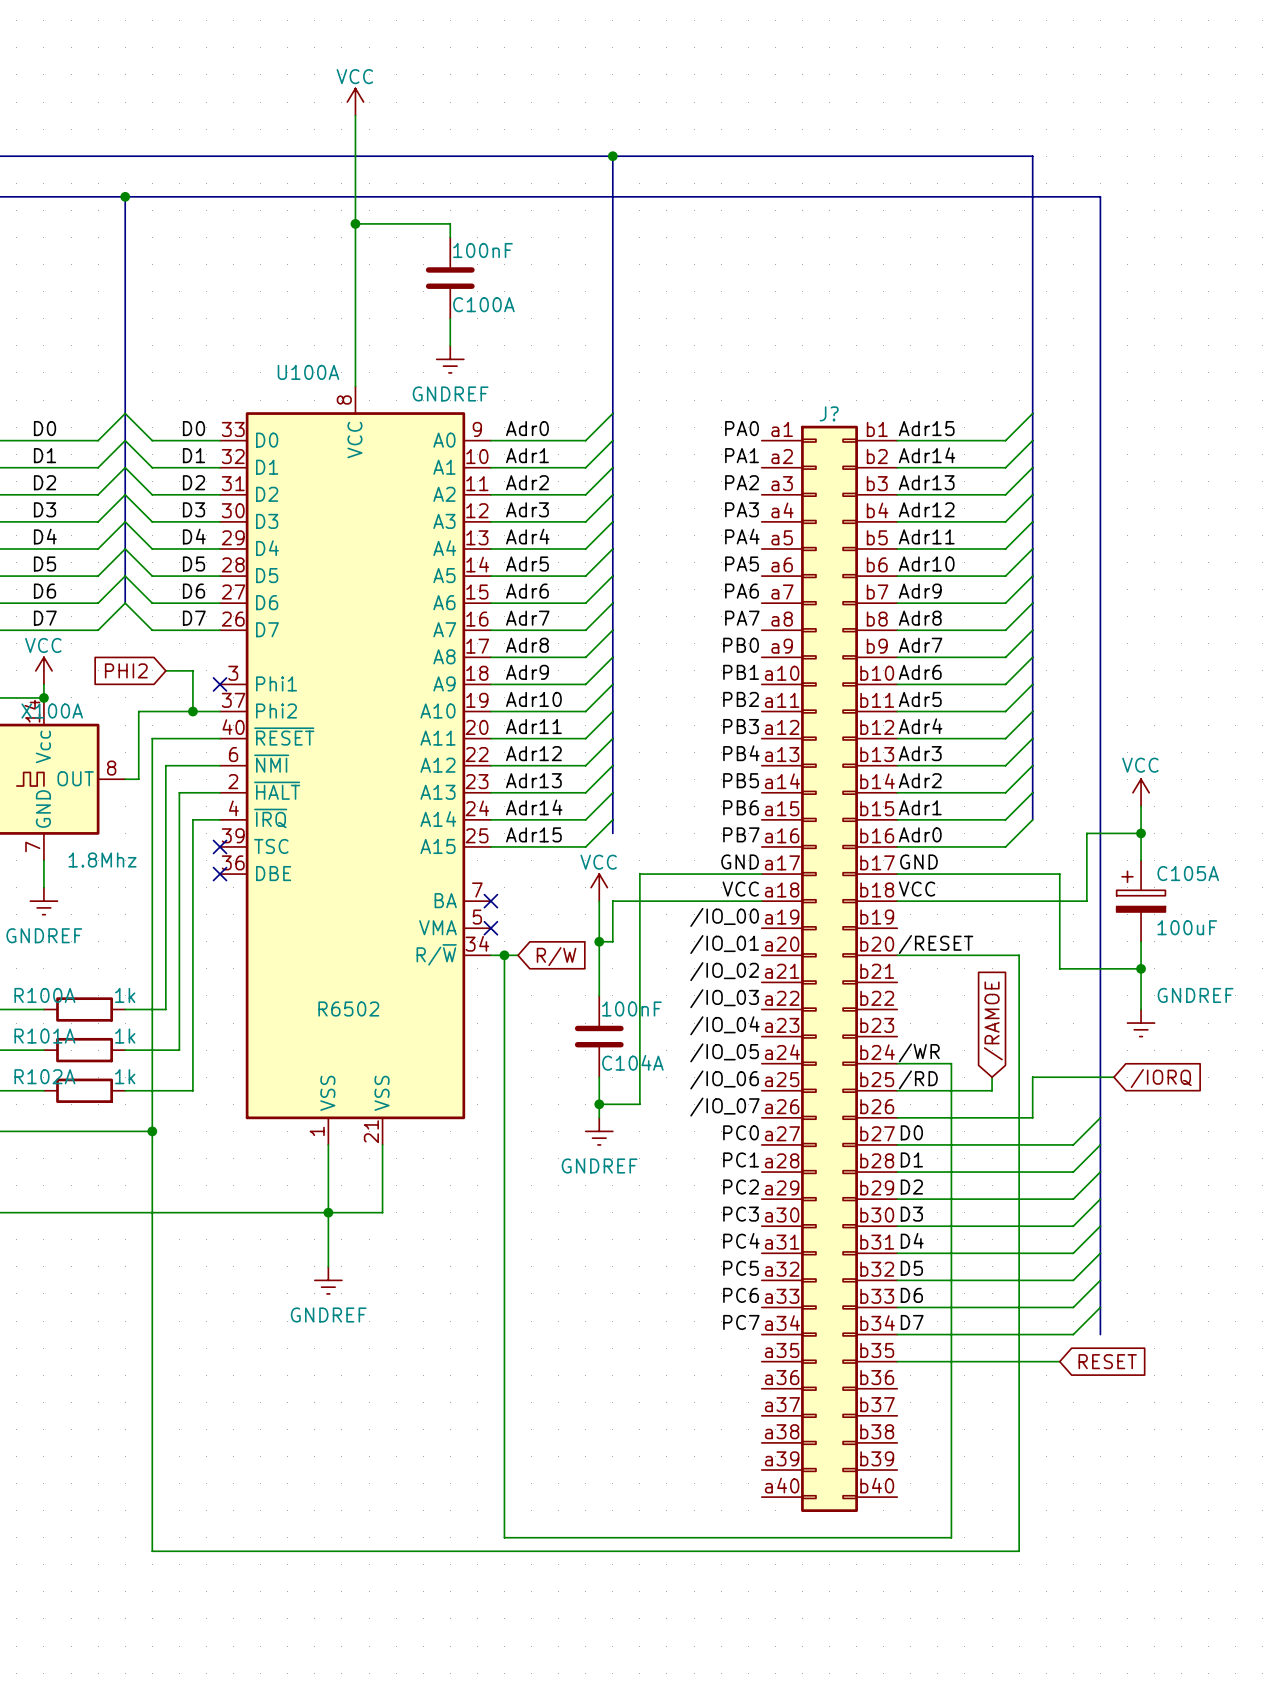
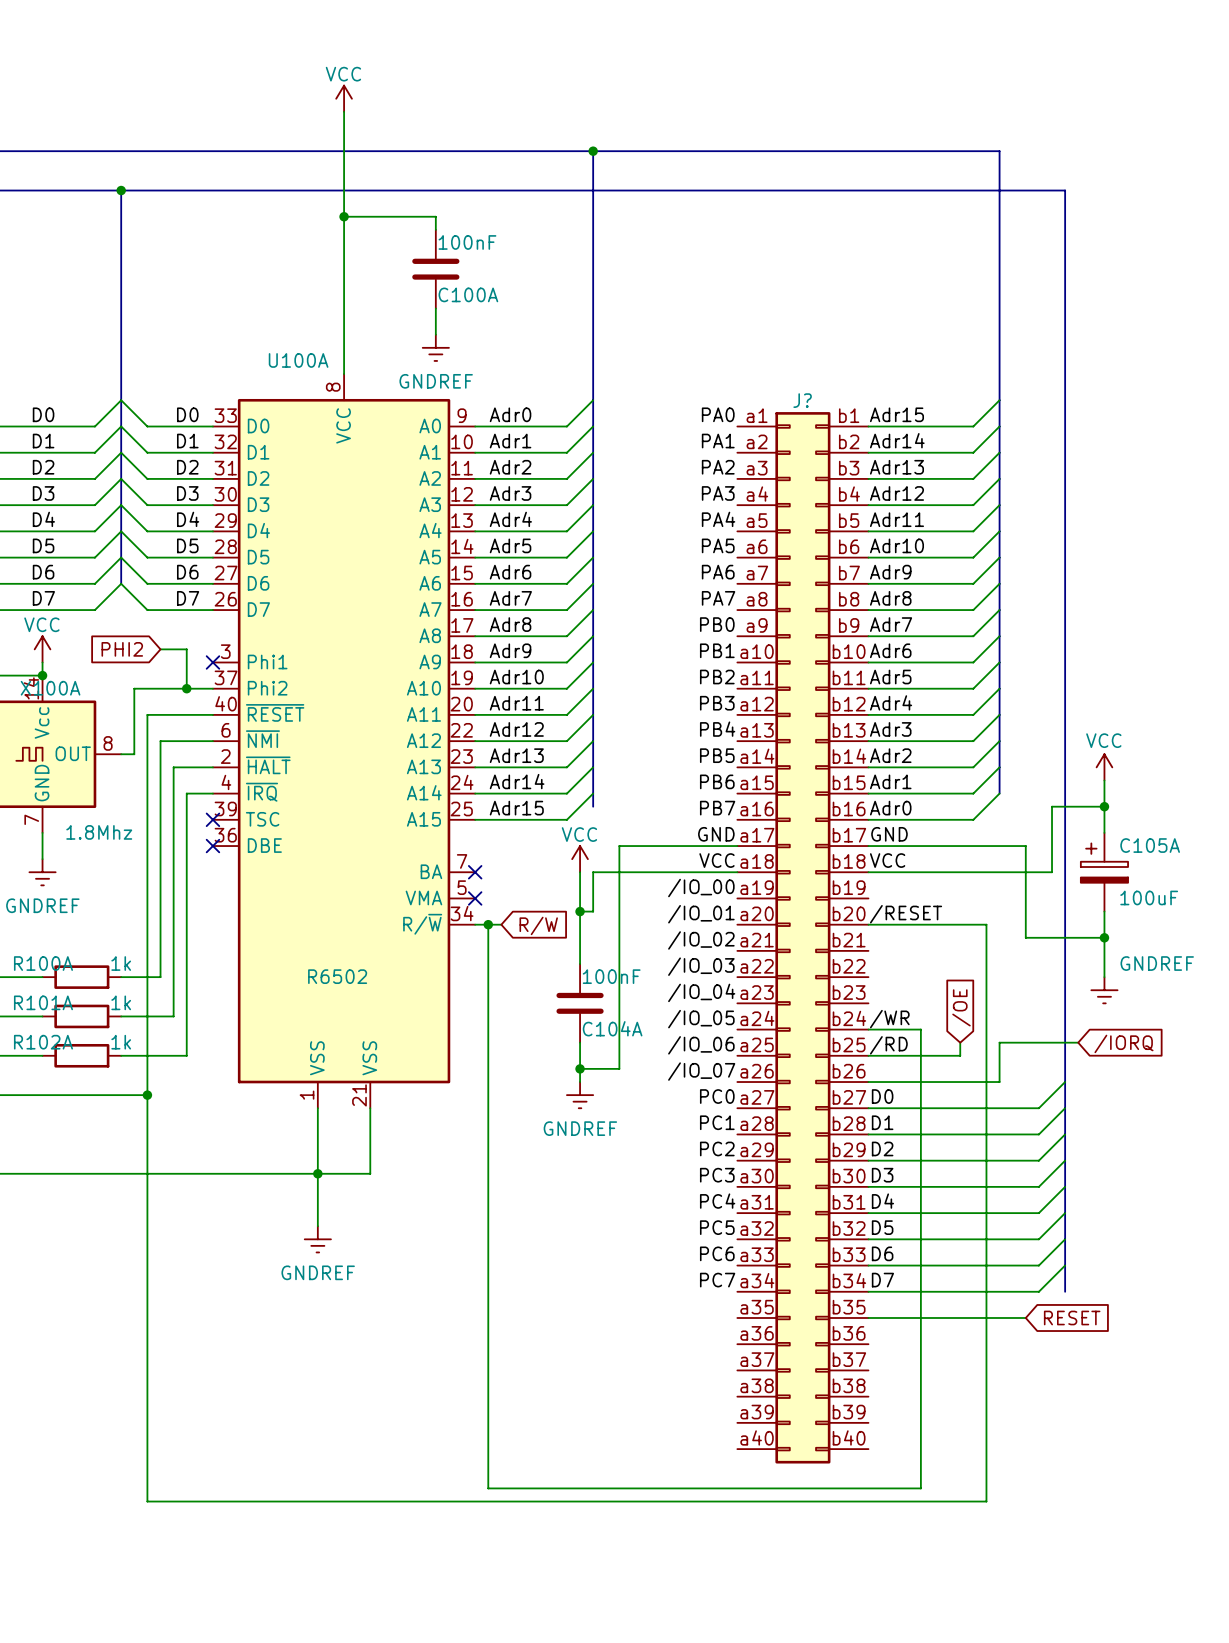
global label: /RAMOE (993, 1020) -> /OE (961, 1007)

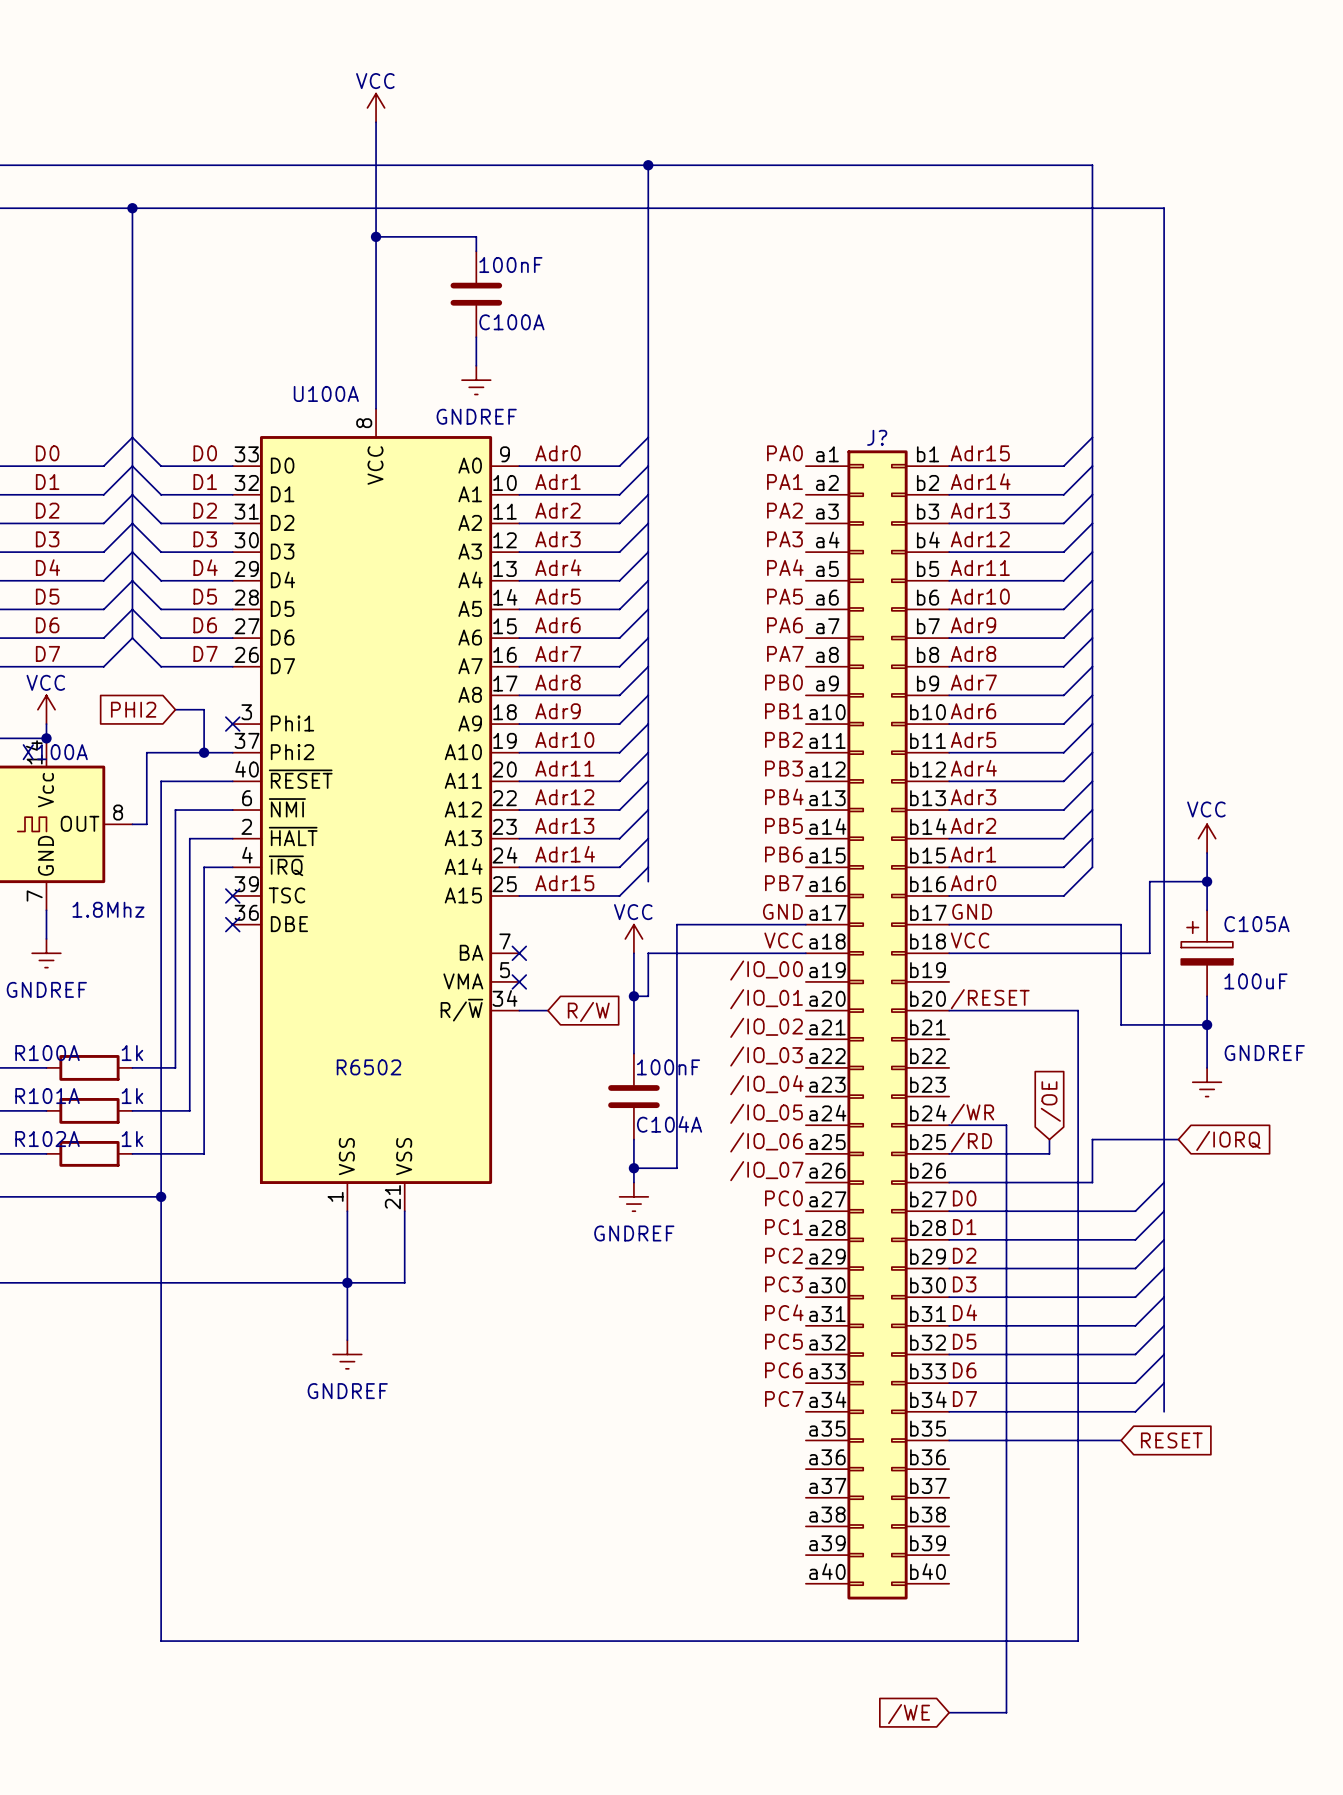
wire: (488, 924) (488, 1488) (920, 1488) -> (949, 1712) (1006, 1712) (1006, 1626)
junction: (488, 924) -> none
global label: none -> /WE (909, 1714)

